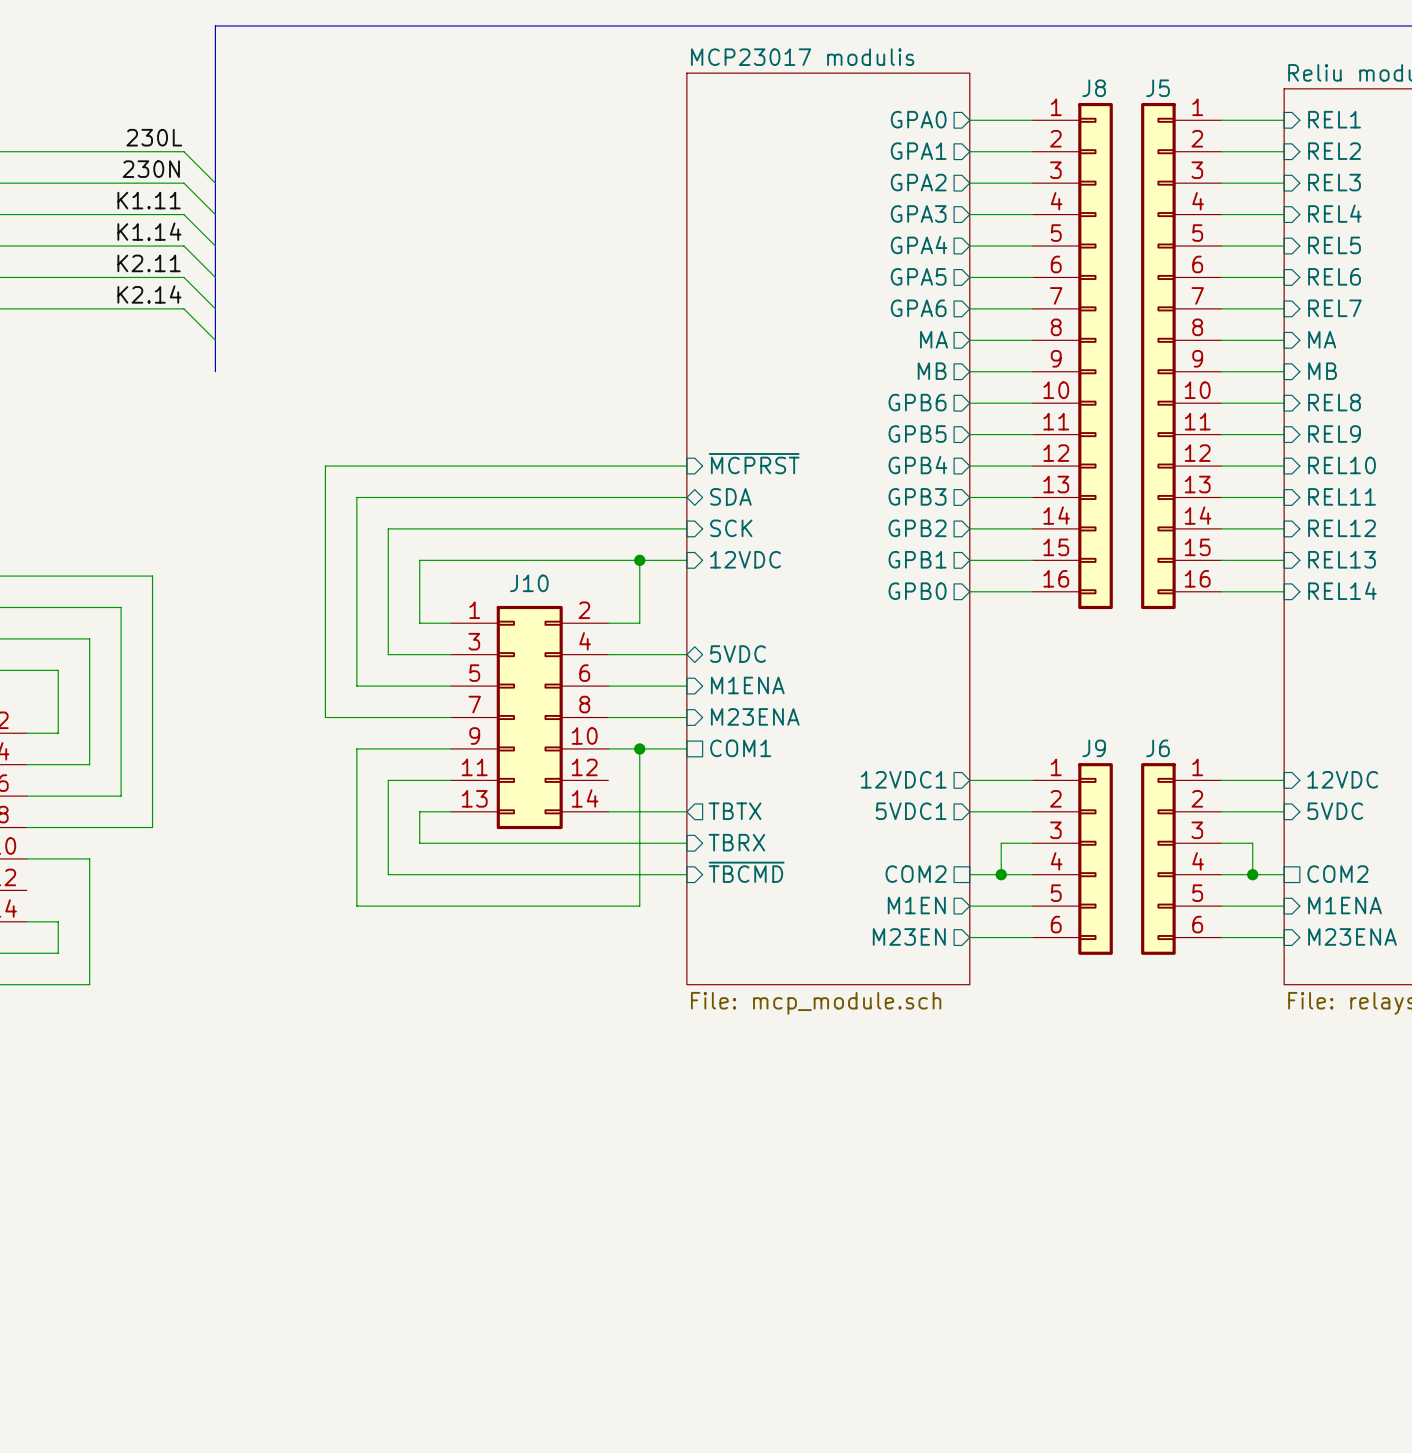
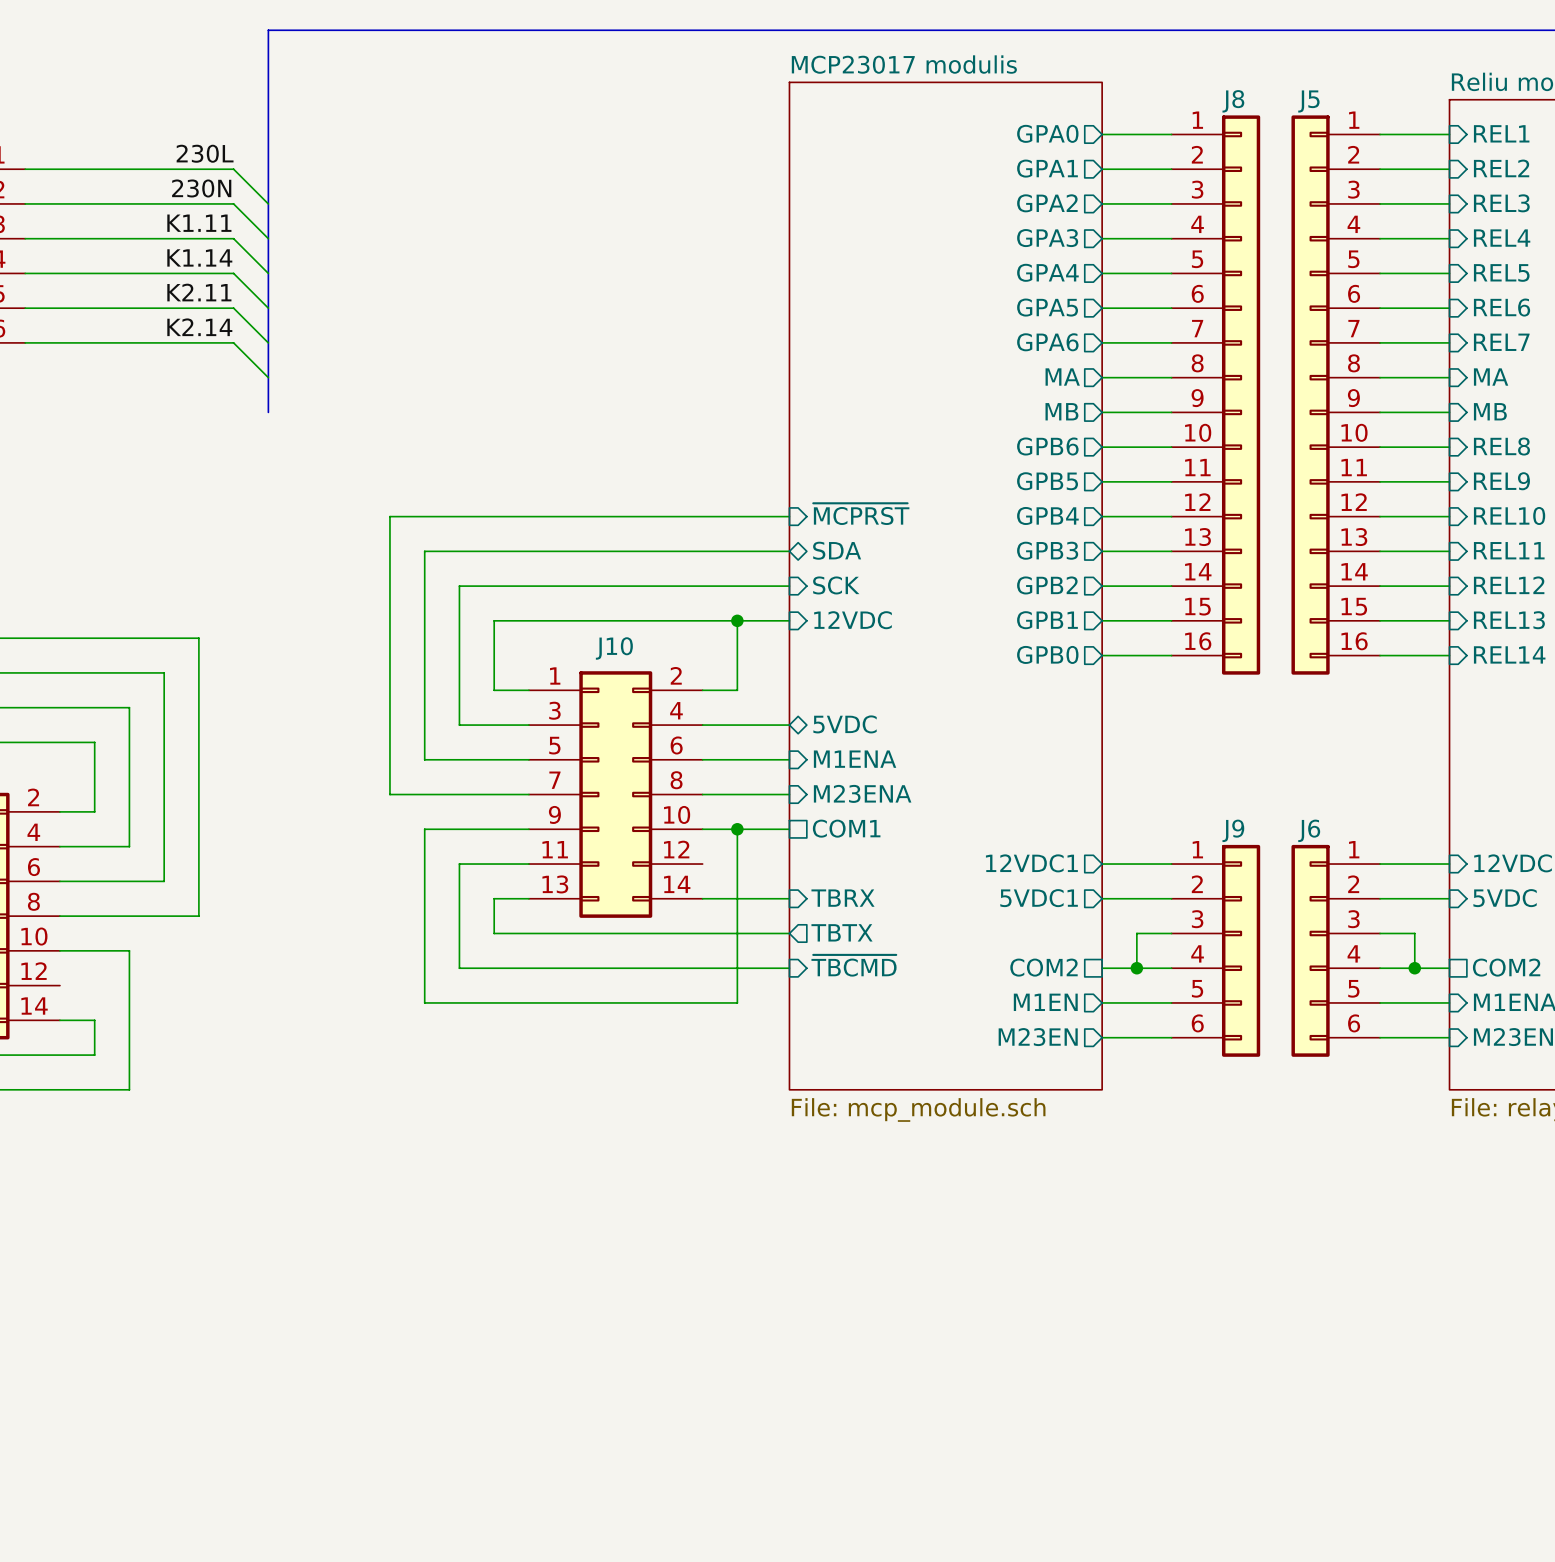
sheet pin shape: output (735, 811) -> input (843, 898)
sheet pin: TBTX (735, 811) -> TBRX (843, 898)
sheet pin shape: input (736, 842) -> output (842, 932)
sheet pin: TBRX (736, 842) -> TBTX (842, 932)

